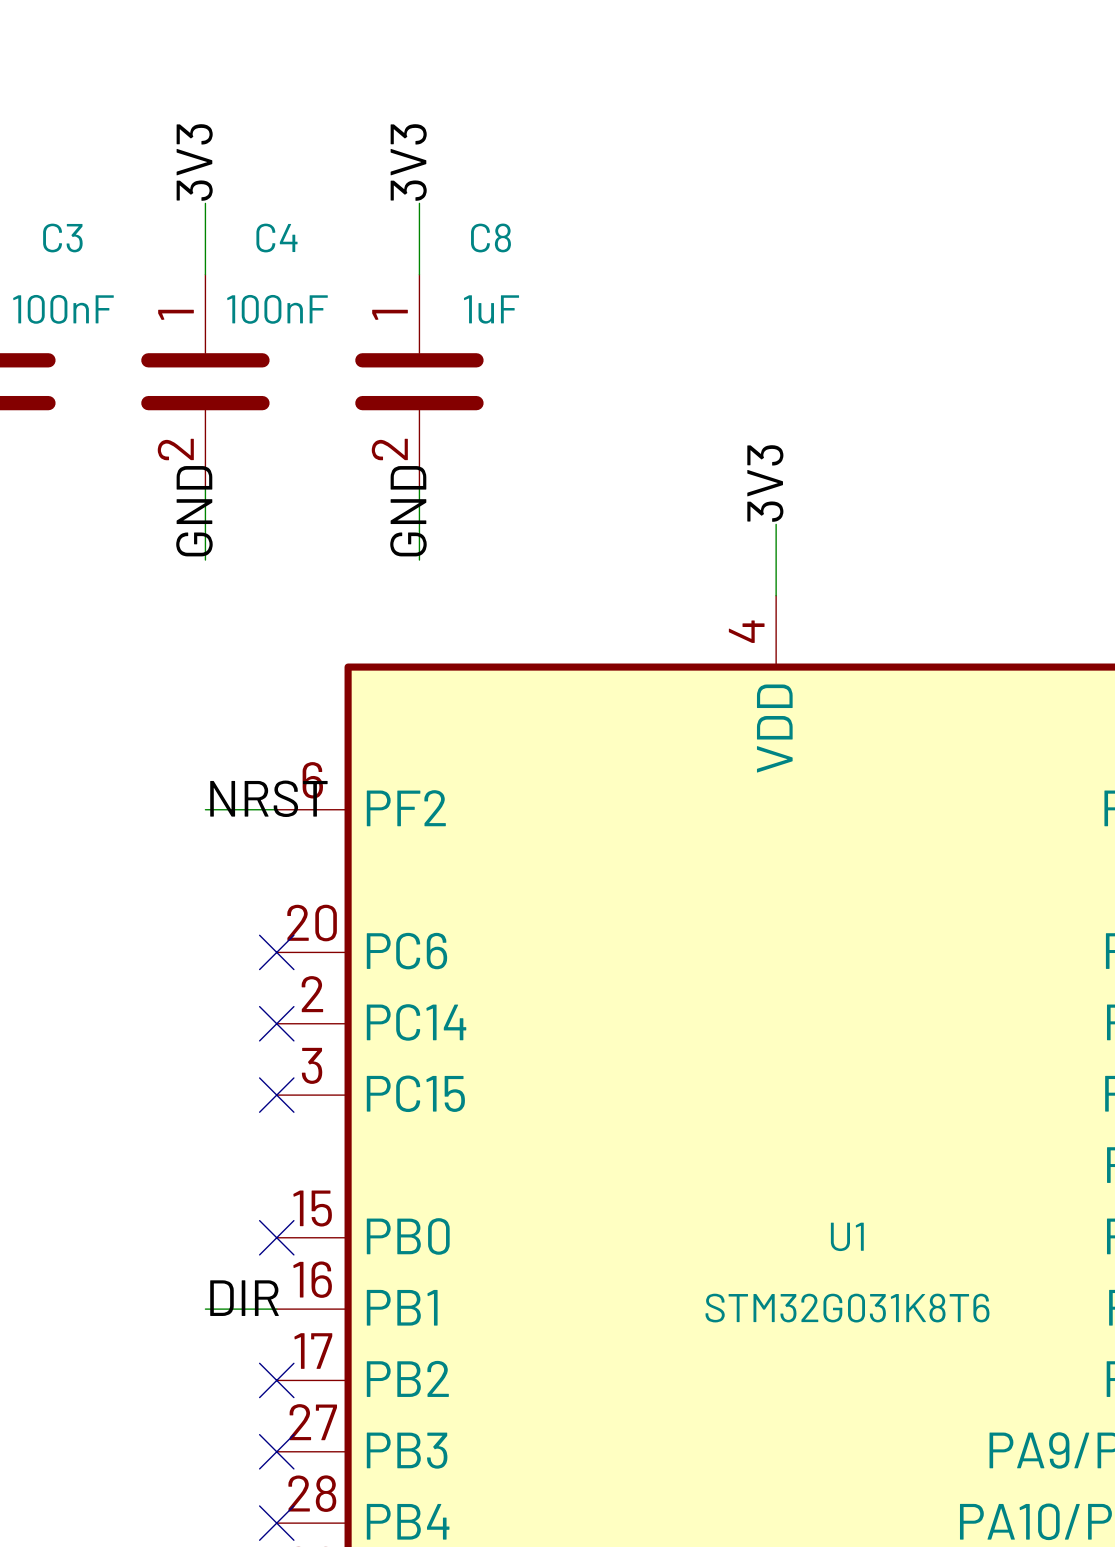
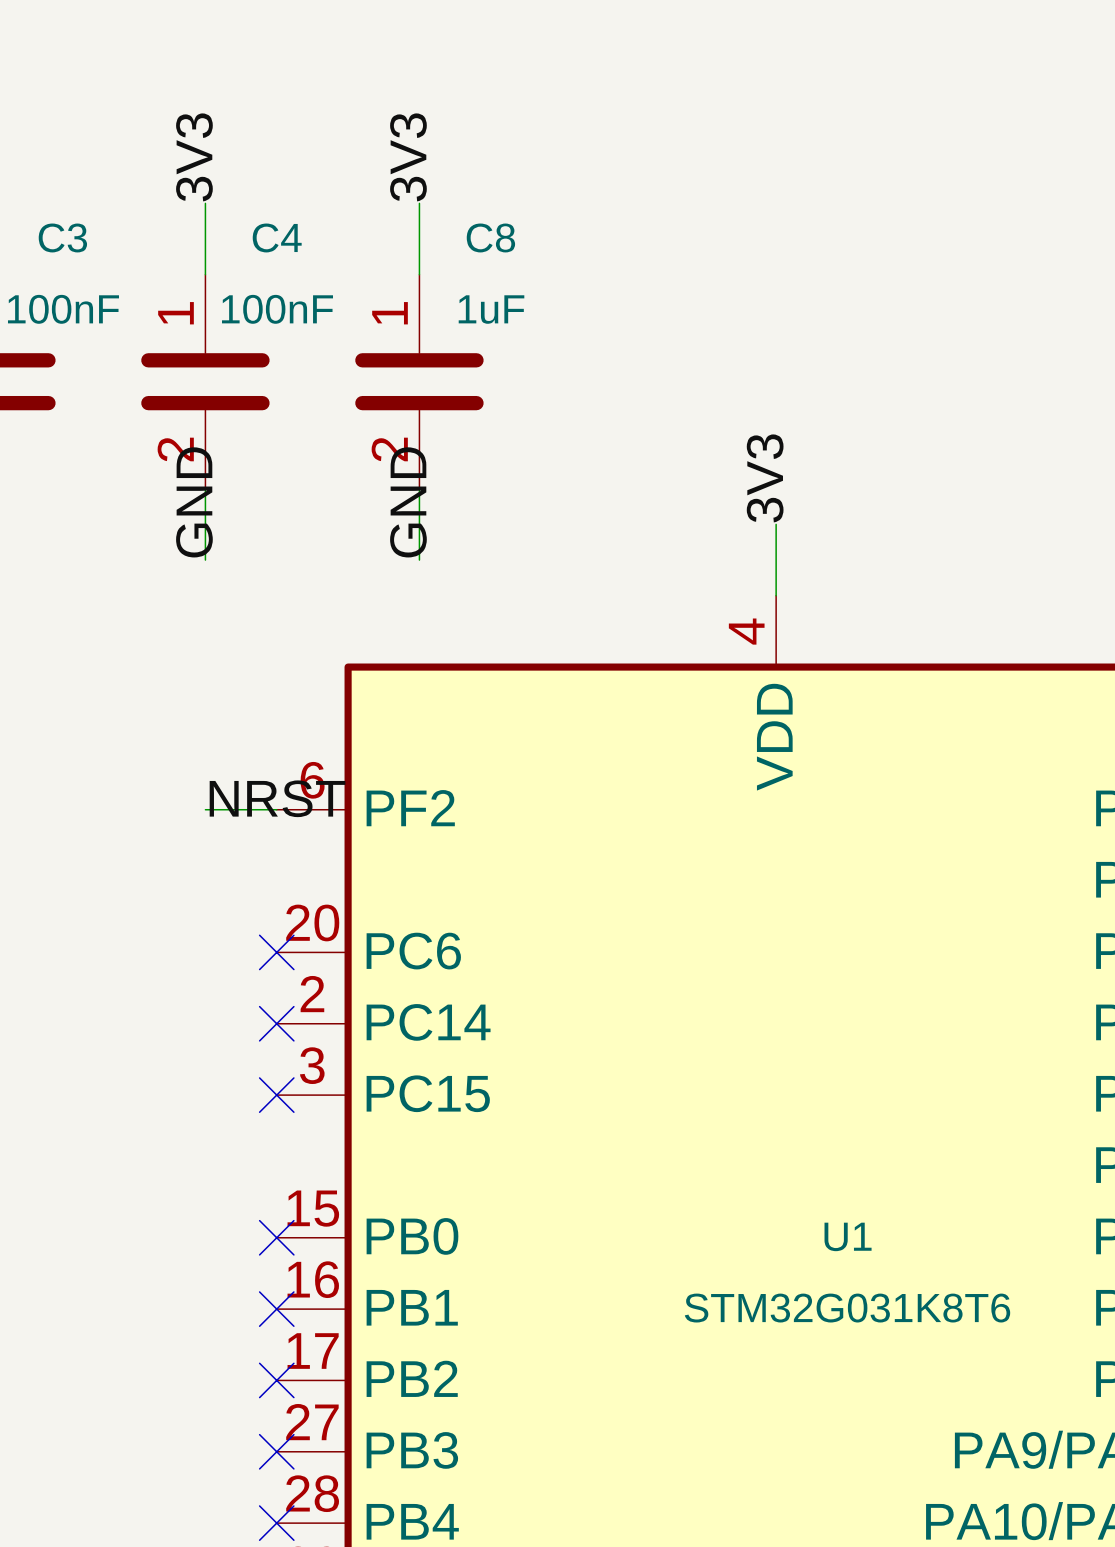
label: DIR (244, 1298) -> none
wire: (205, 1309) (276, 1309) -> none
no-connect mark: none -> (276, 1309)

